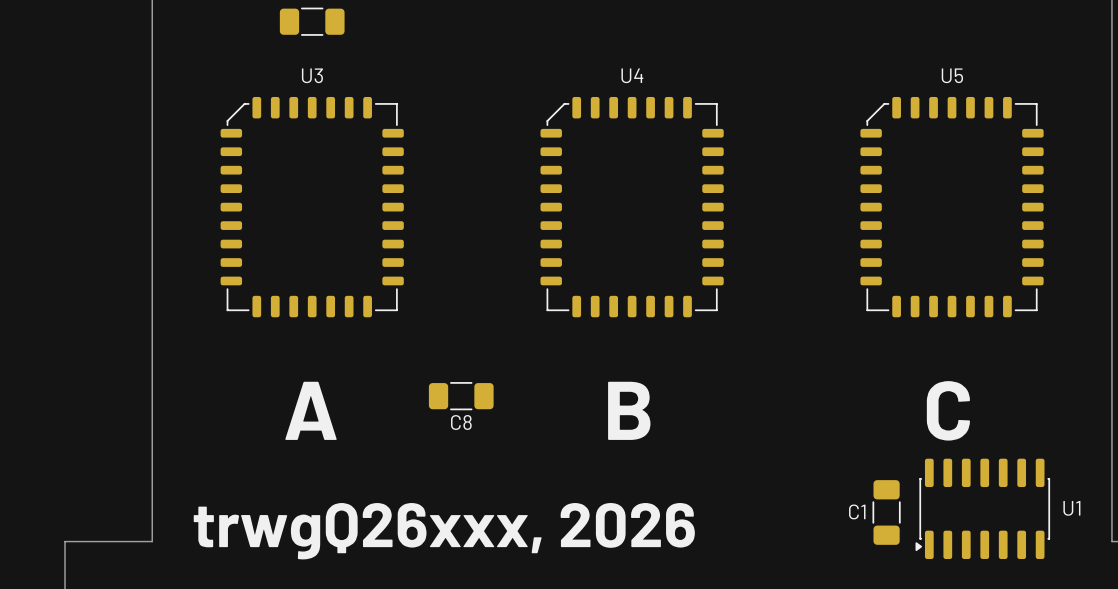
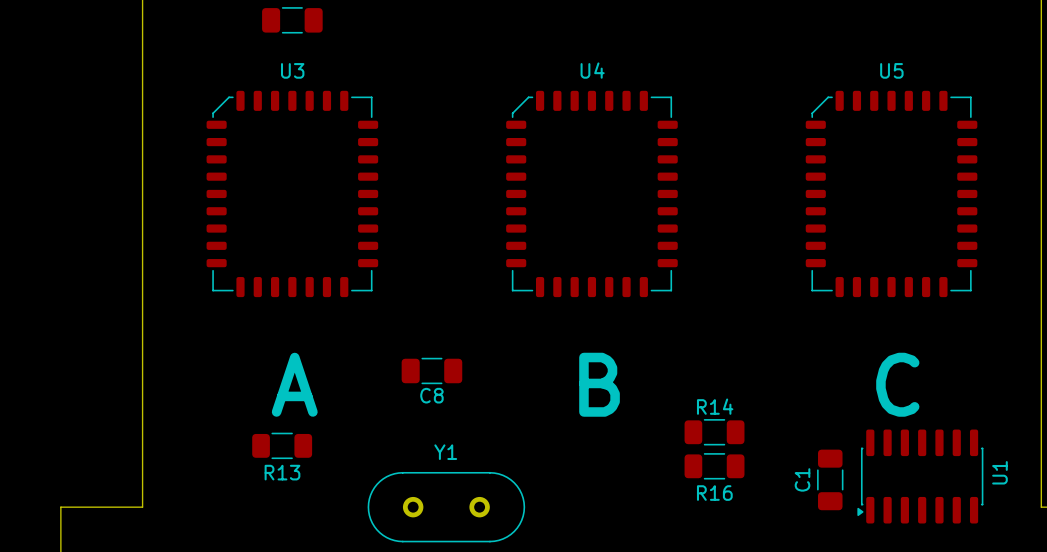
R14: none -> (714, 432)
R13: none -> (282, 445)
R16: none -> (714, 466)
U1 name rotation: 0° (1071, 508) -> 90° counterclockwise (999, 472)
C1 name rotation: 0° (857, 511) -> 90° counterclockwise (802, 479)
text: trwgQ26xxx, 2026 (444, 531) -> none
Y1: none -> (446, 507)

